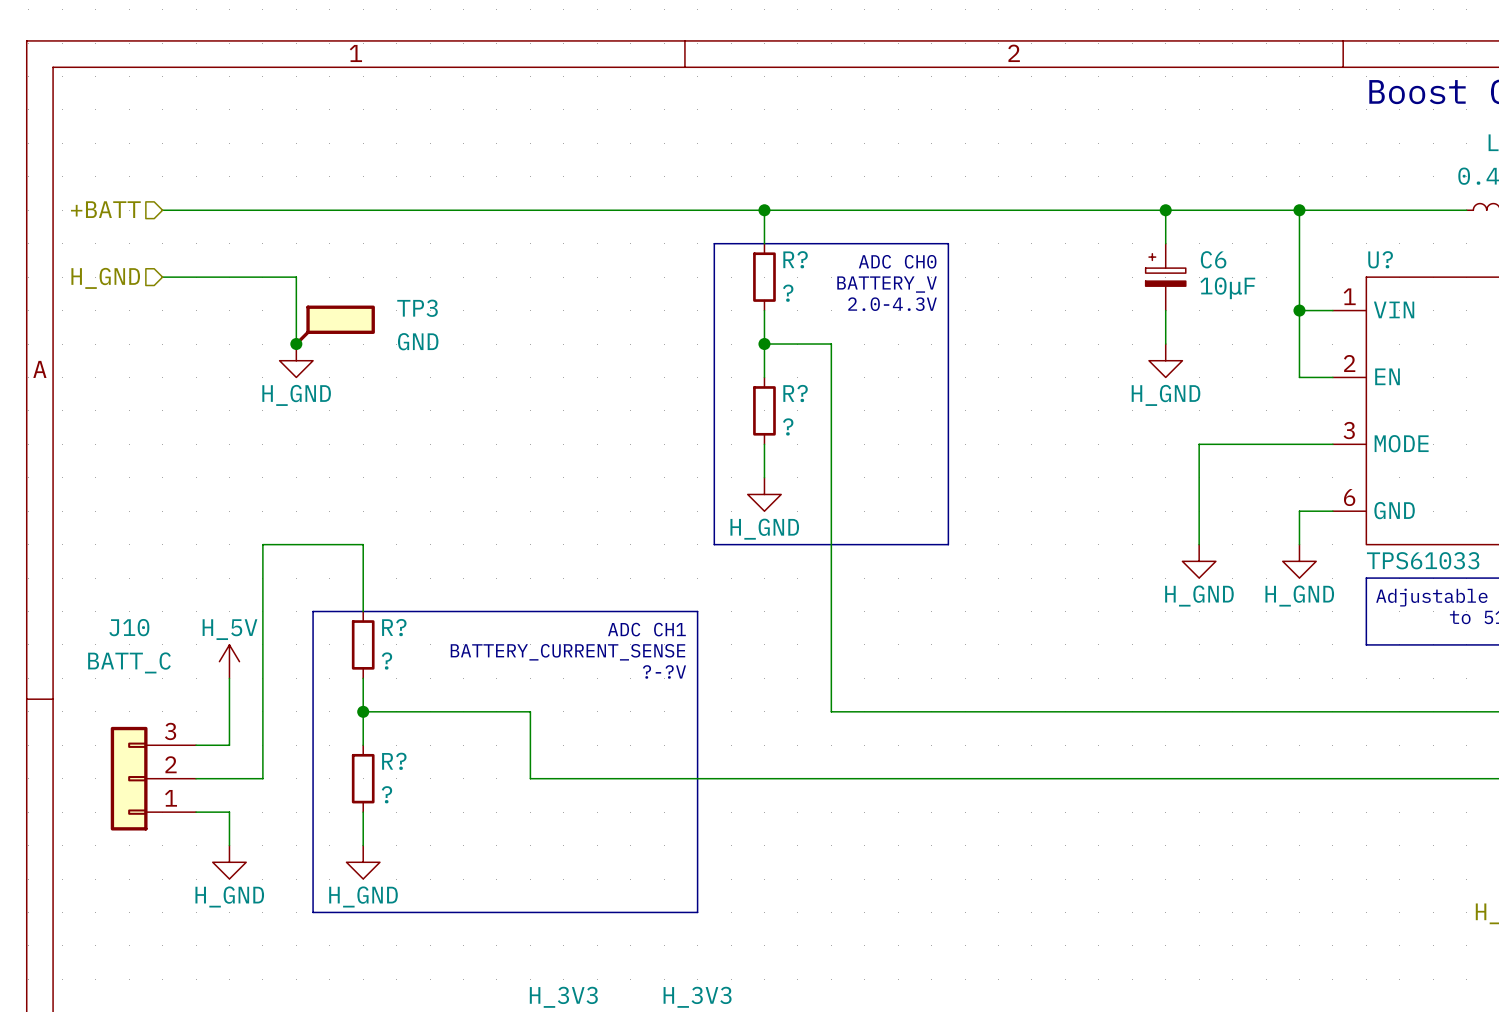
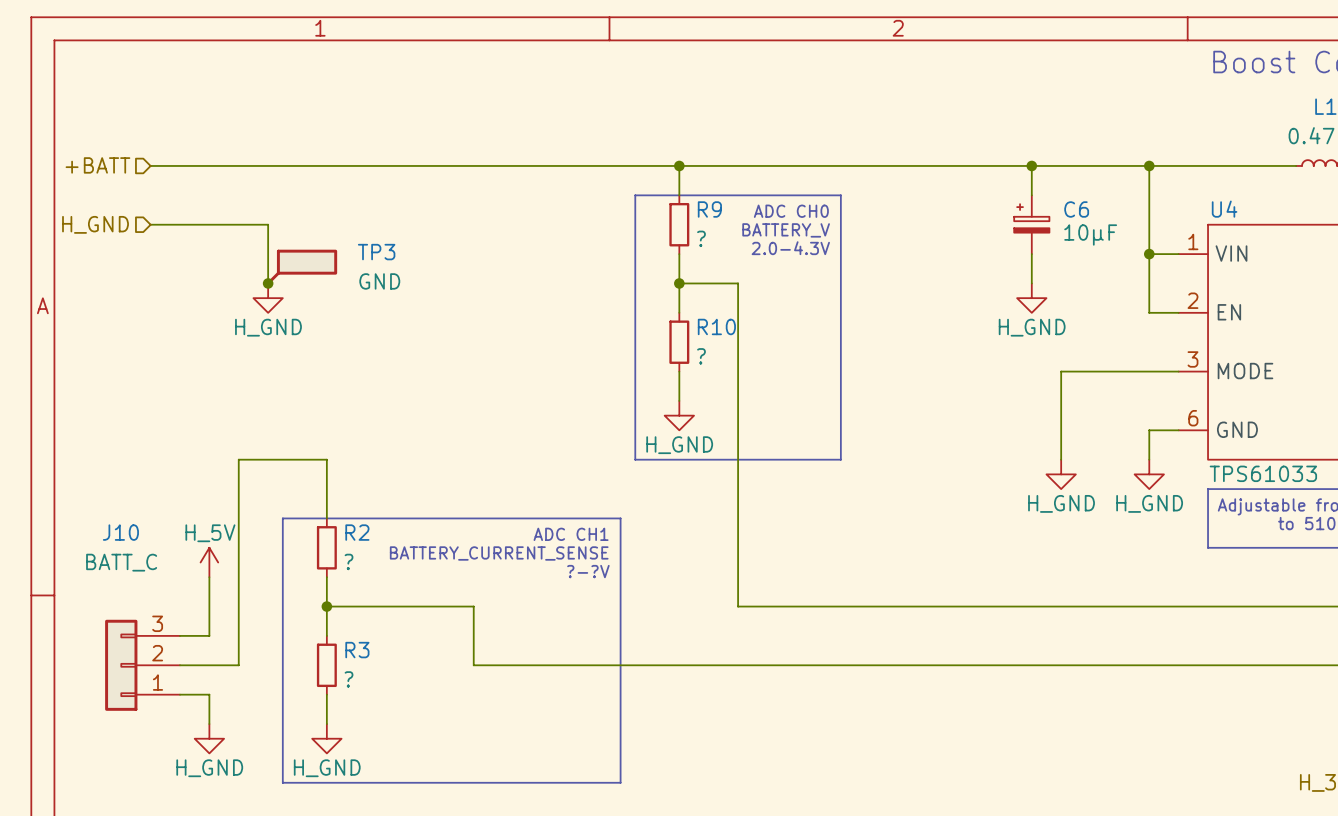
R? name: R? (795, 259) -> R9 (709, 209)
U? name: U? (1380, 259) -> U4 (1224, 209)
R? name: R? (795, 393) -> R10 (716, 326)
R? name: R? (394, 627) -> R2 (357, 532)
R? name: R? (394, 761) -> R3 (357, 650)

